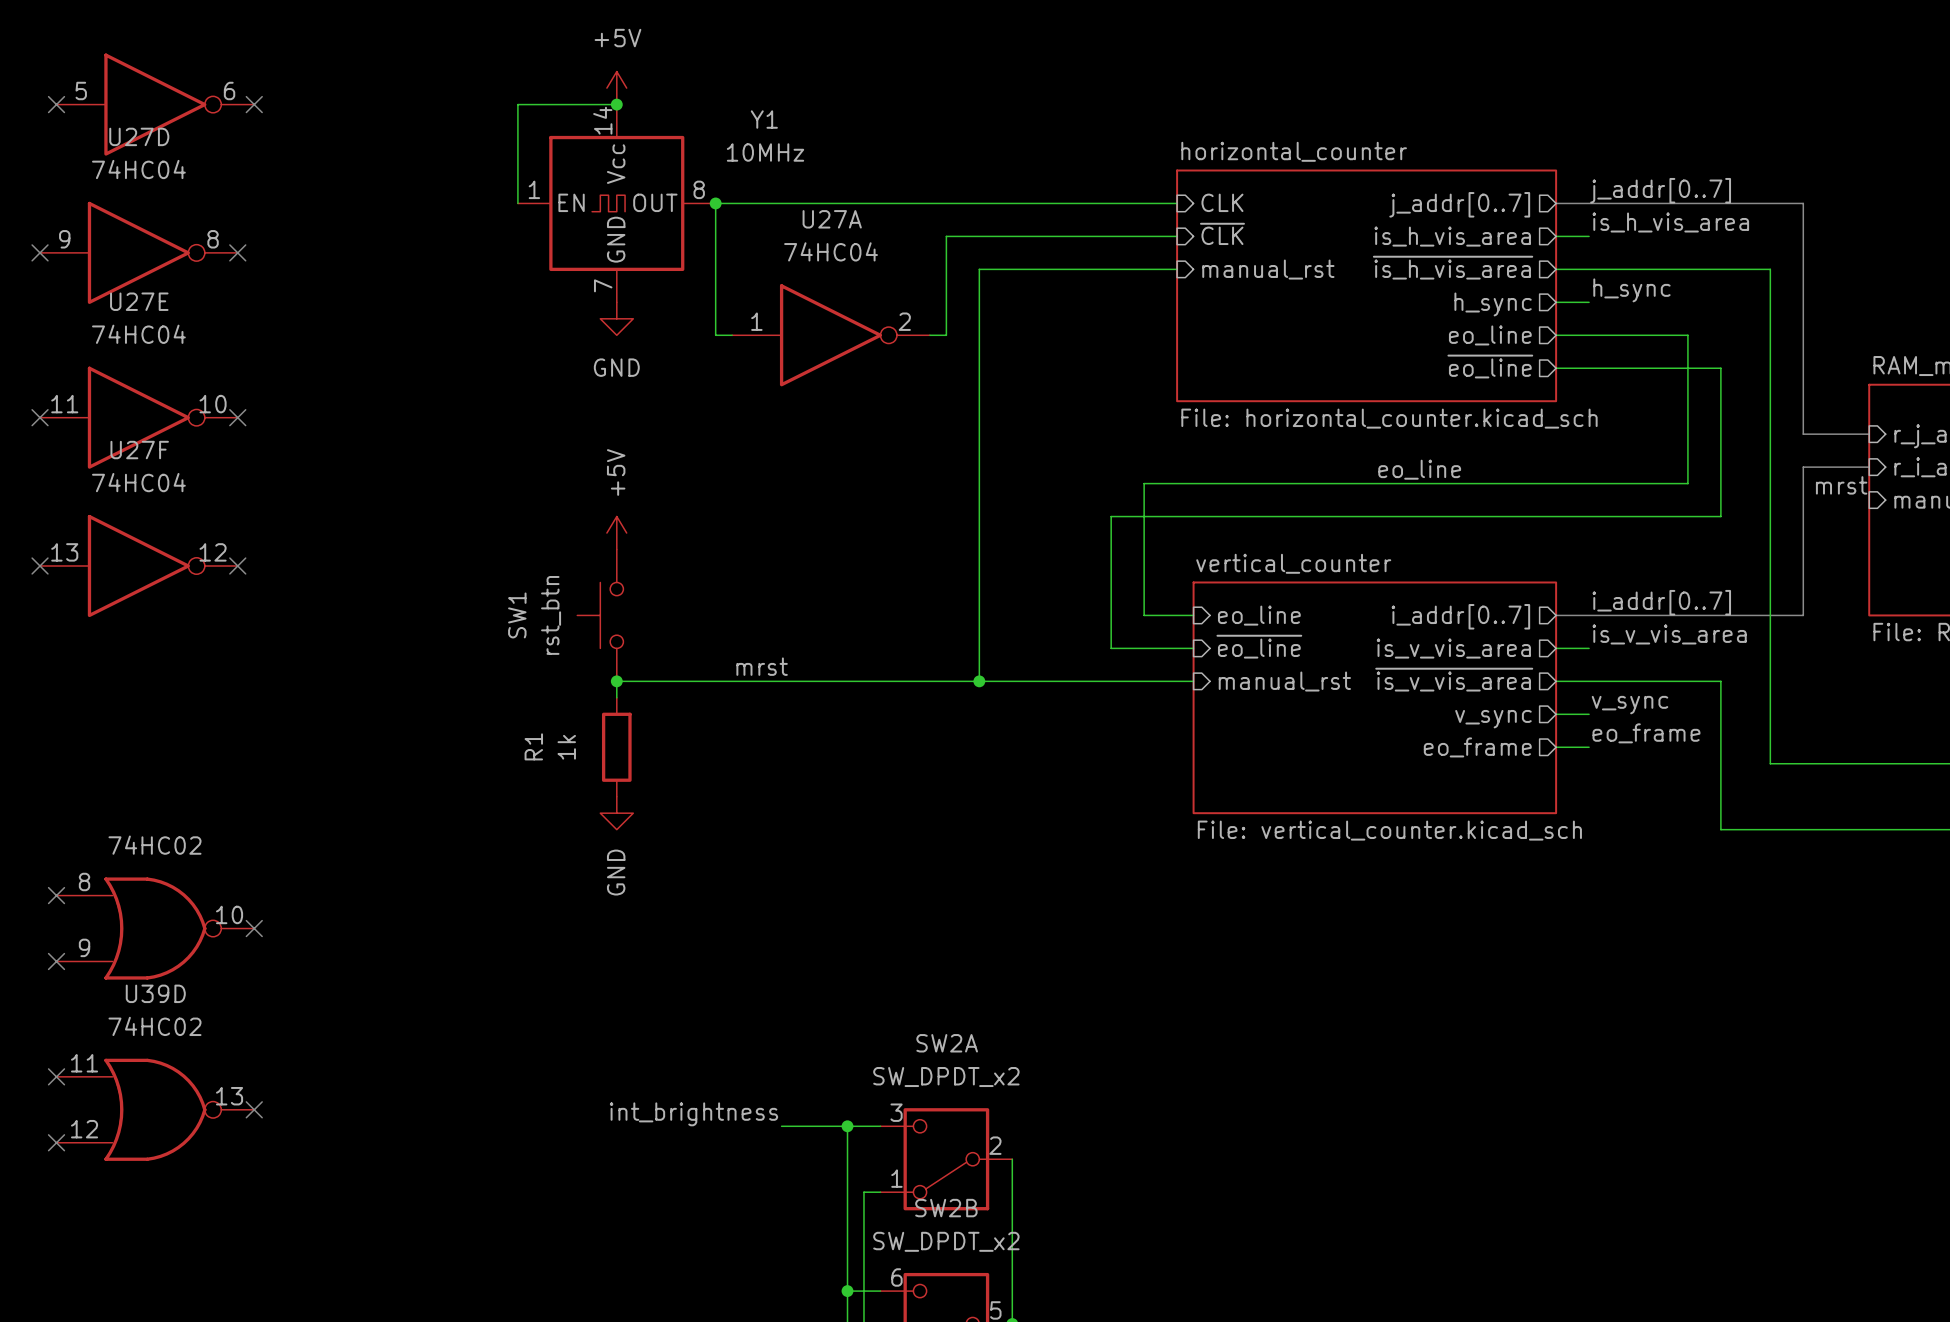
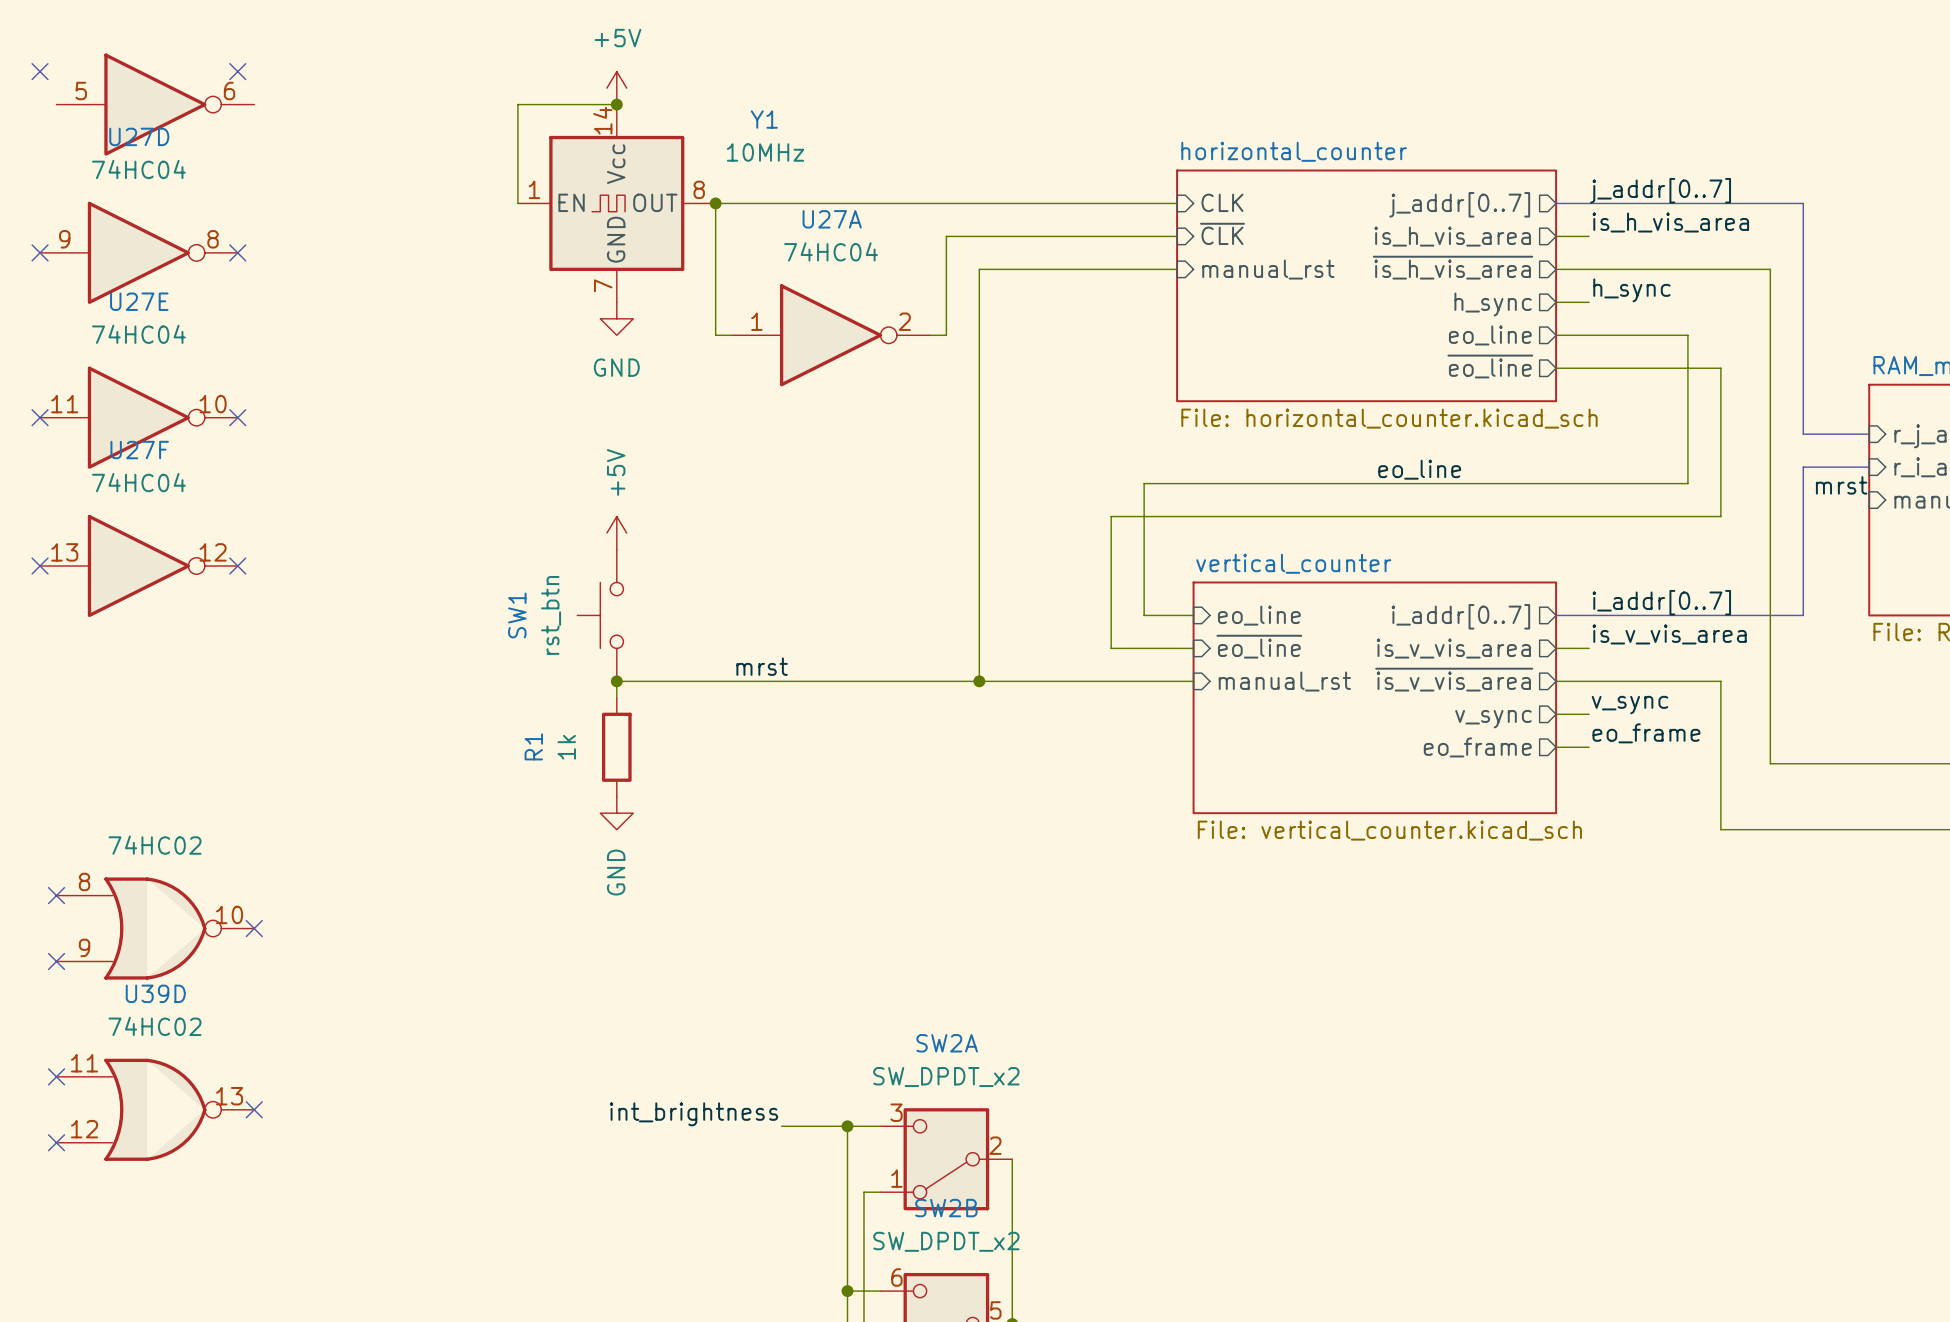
no-connect mark position: (56, 104) -> (40, 71)
no-connect mark position: (254, 104) -> (237, 71)

